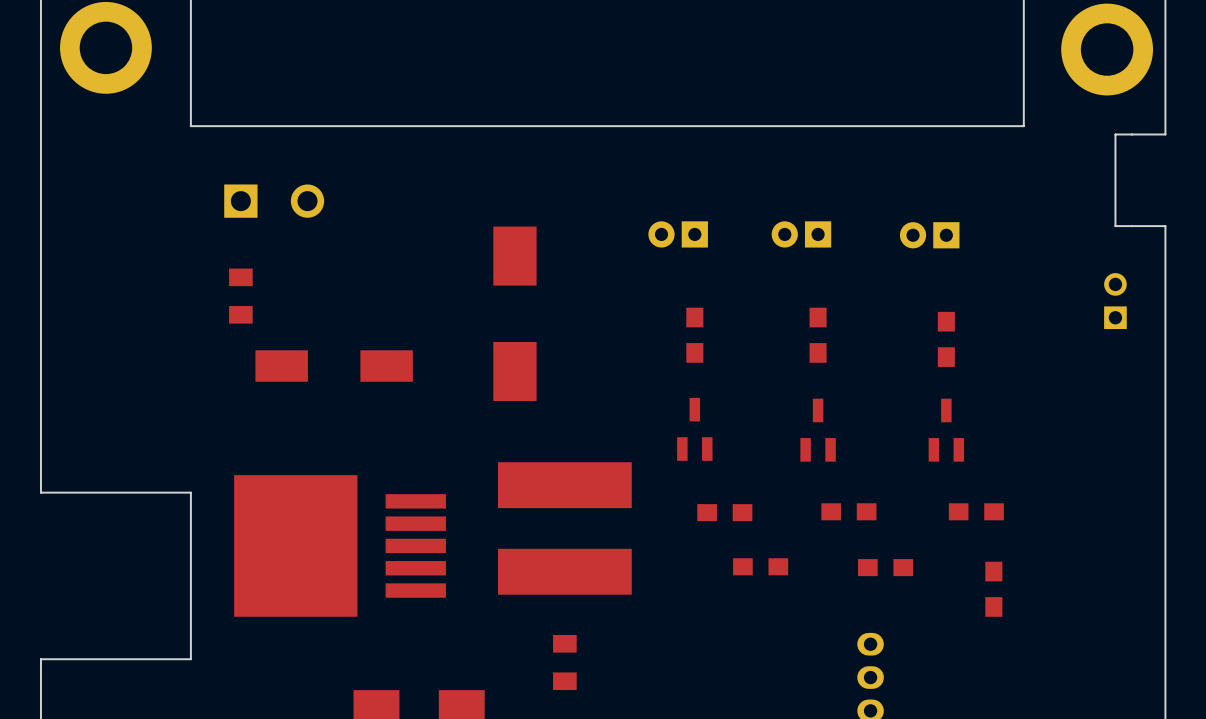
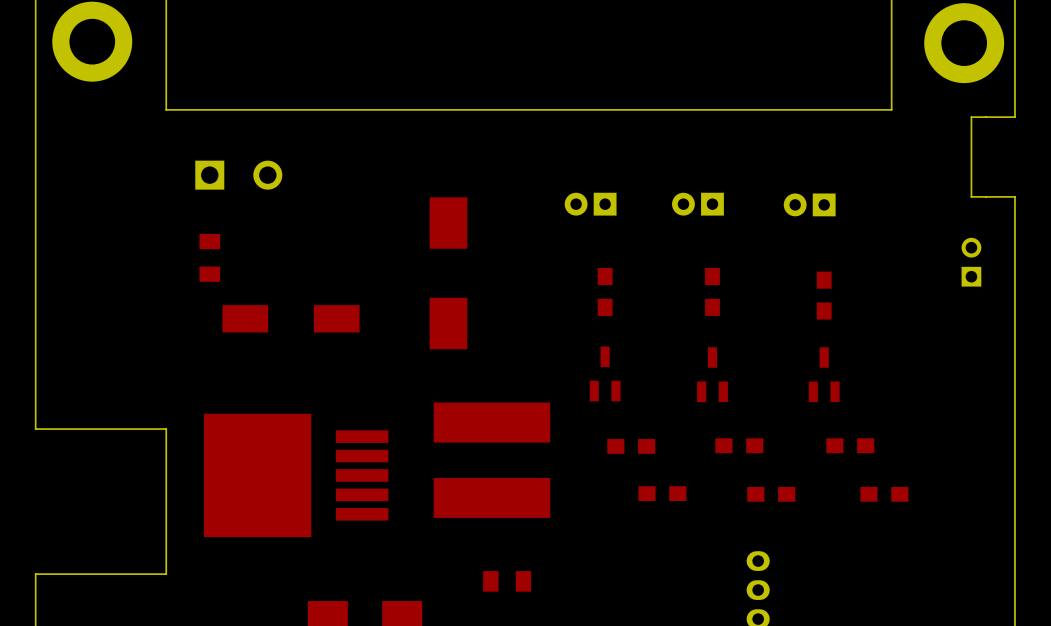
part rotation: 0° (993, 589) -> 90° clockwise (884, 494)
part rotation: 0° (564, 662) -> 90° clockwise (507, 581)

